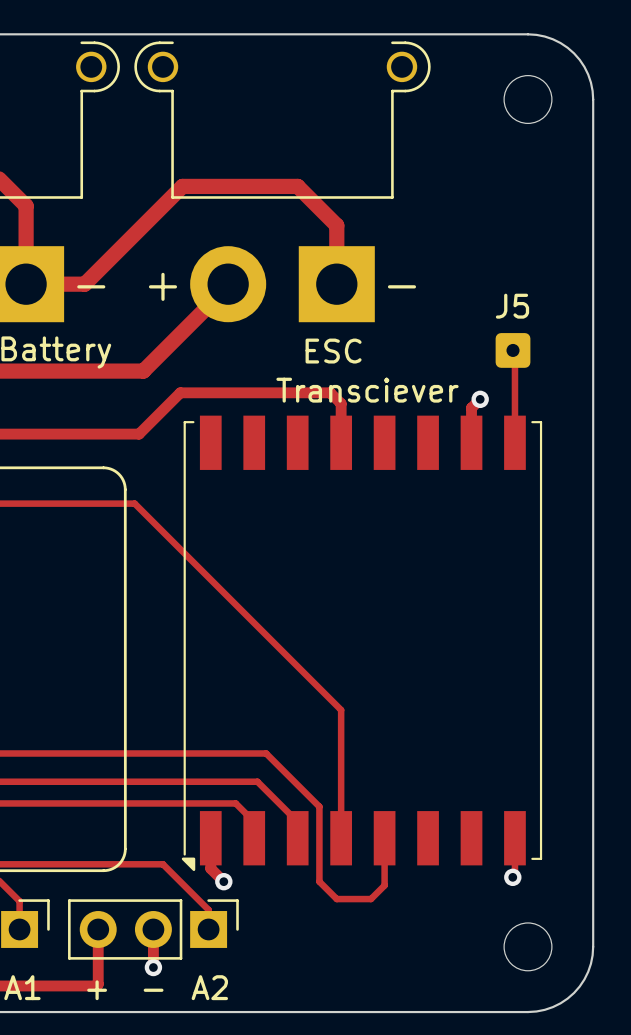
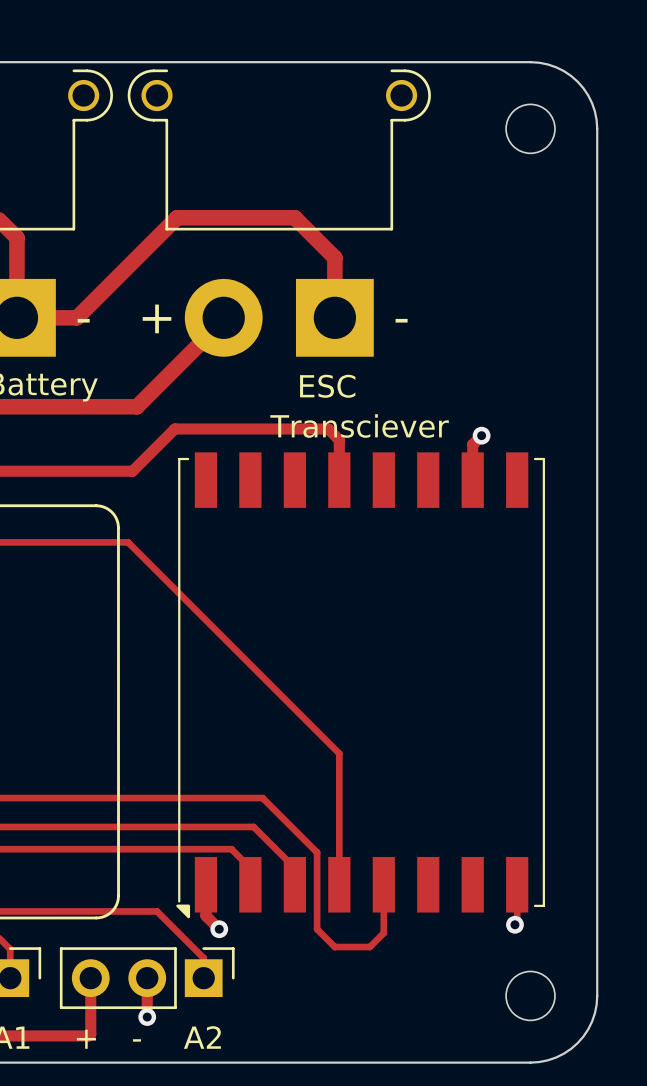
track: (513, 350) (514, 352) (514, 442) -> none
J5: (513, 350) -> none

